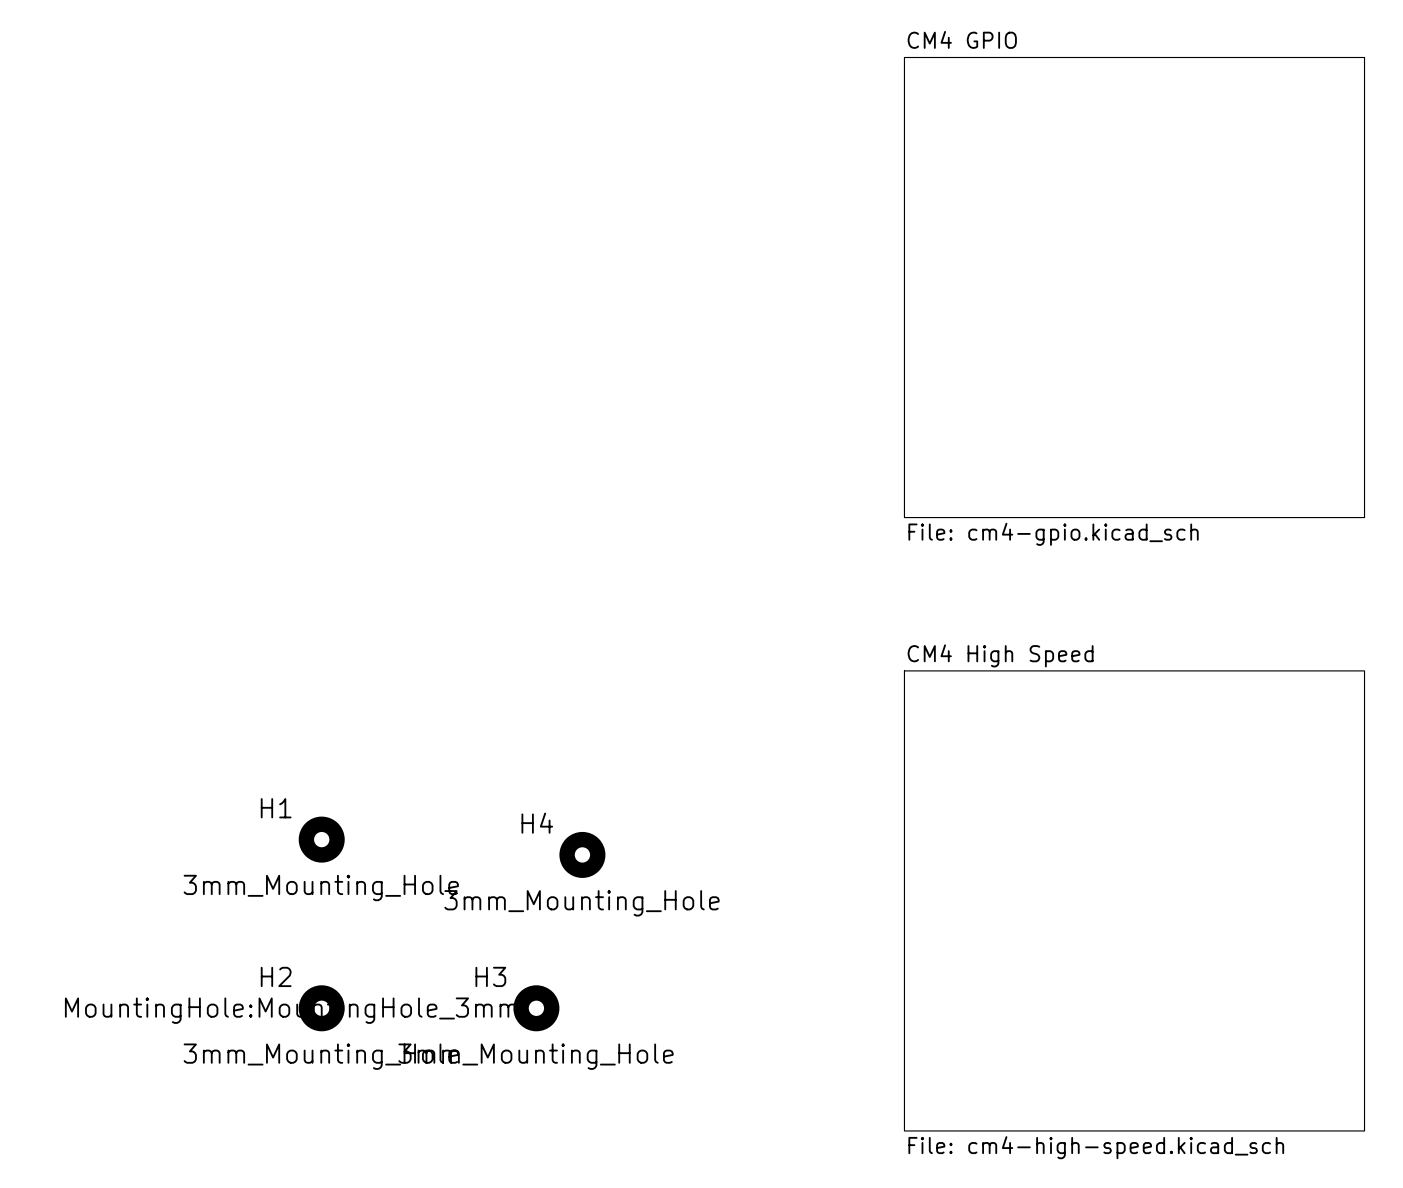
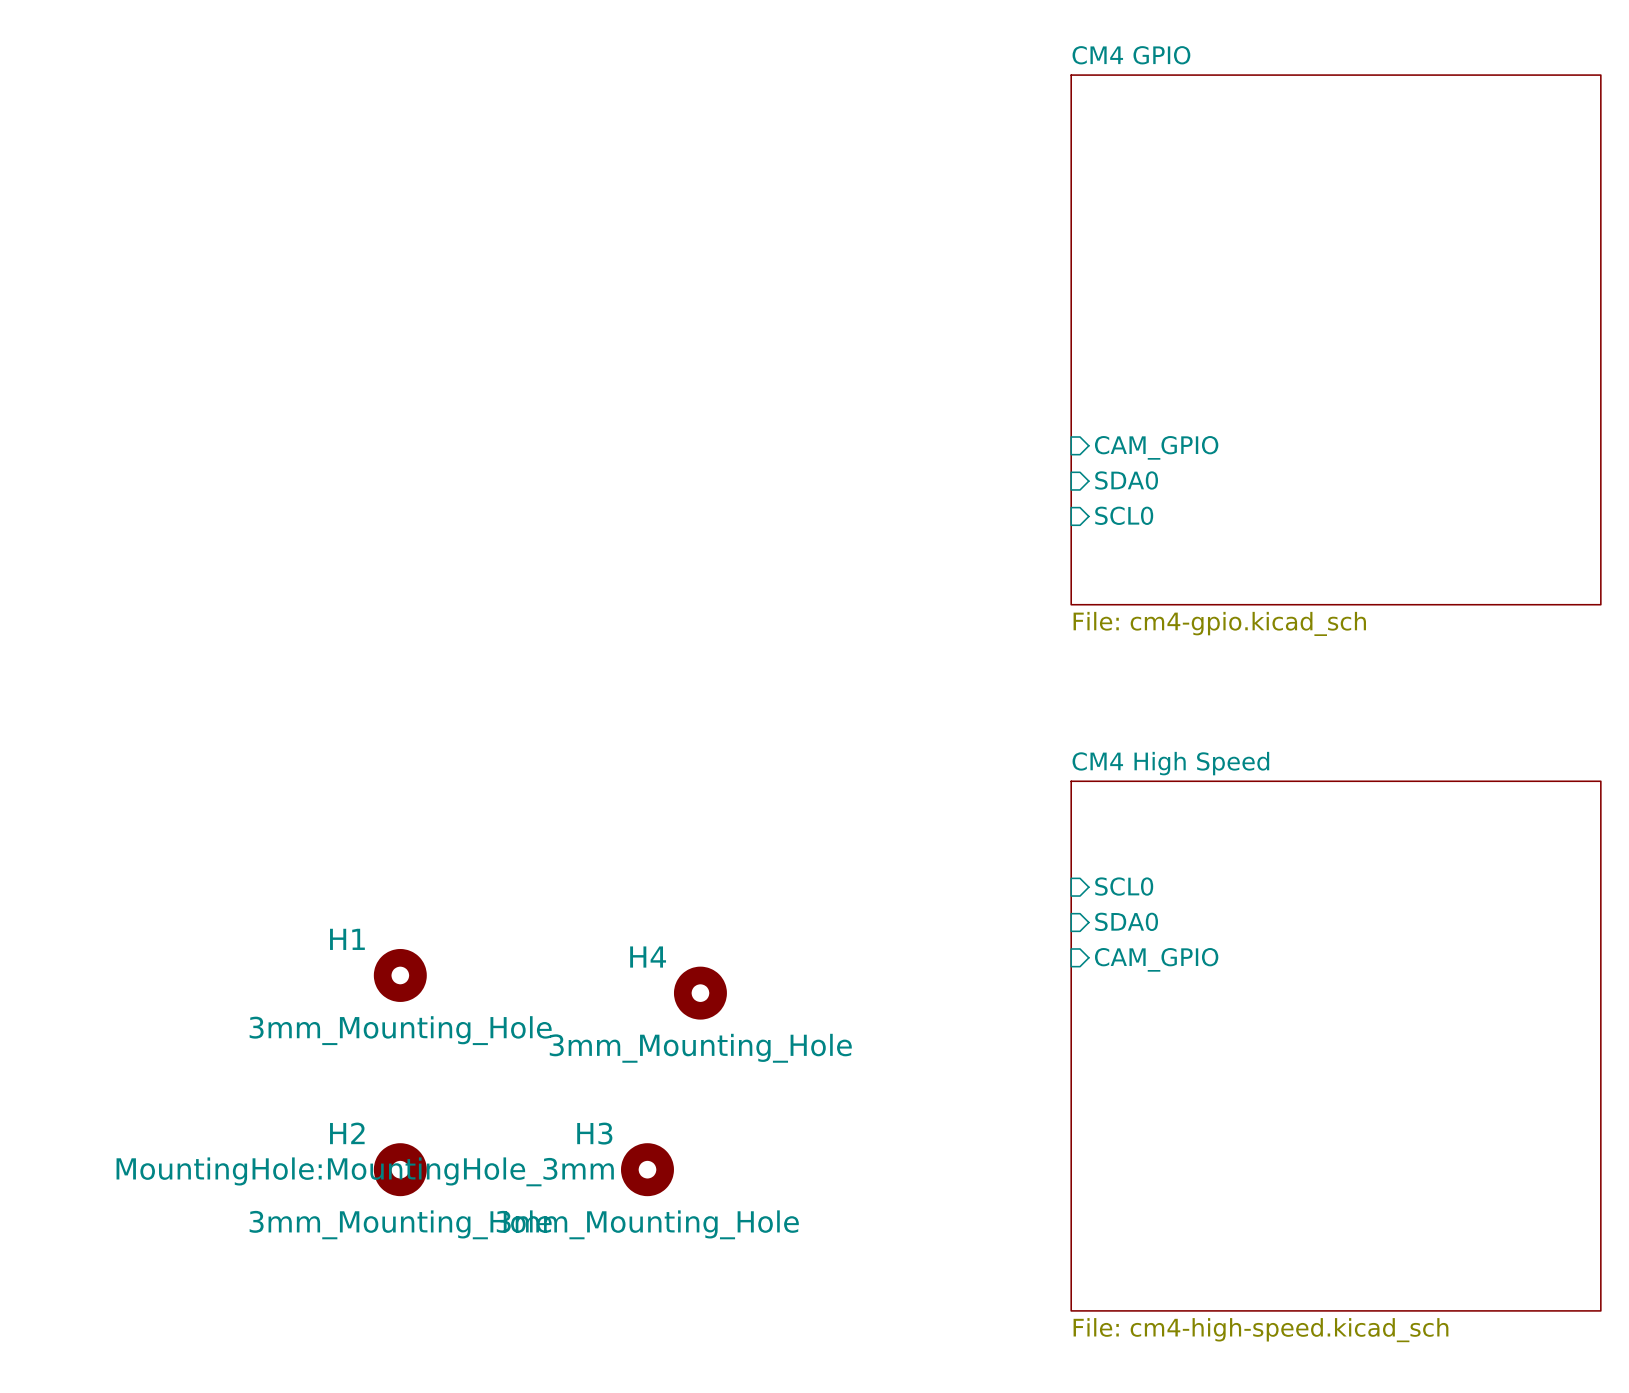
sheet pin: none -> CAM_GPIO (1156, 447)
sheet pin: none -> SDA0 (1126, 480)
sheet pin: none -> SCL0 (1124, 515)
sheet pin: none -> SCL0 (1124, 886)
sheet pin: none -> SDA0 (1126, 921)
sheet pin: none -> CAM_GPIO (1156, 959)

